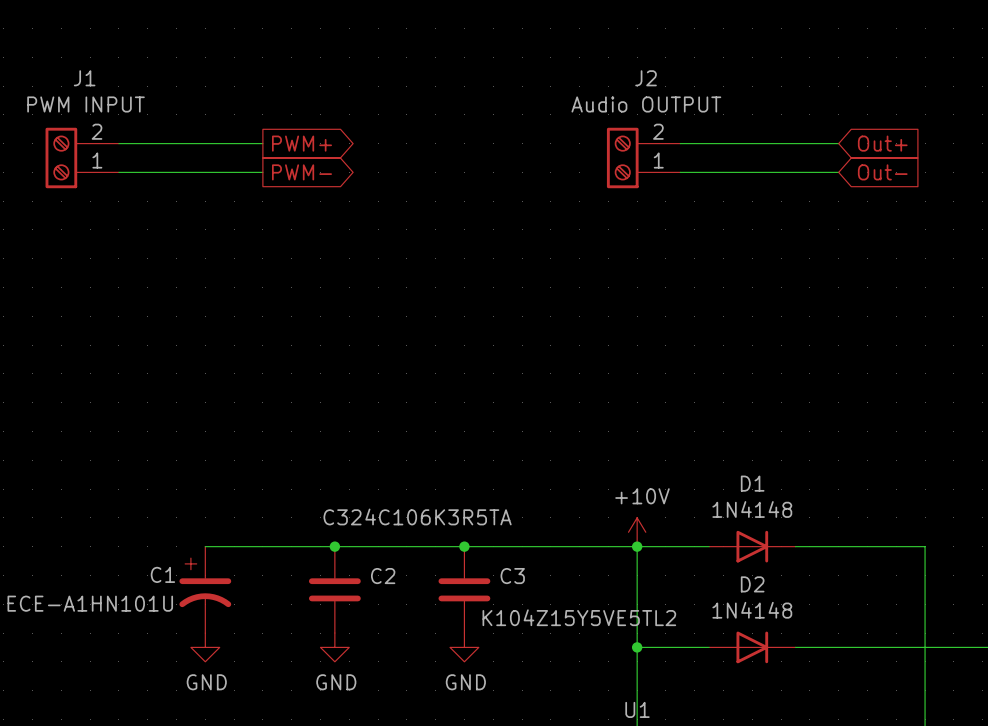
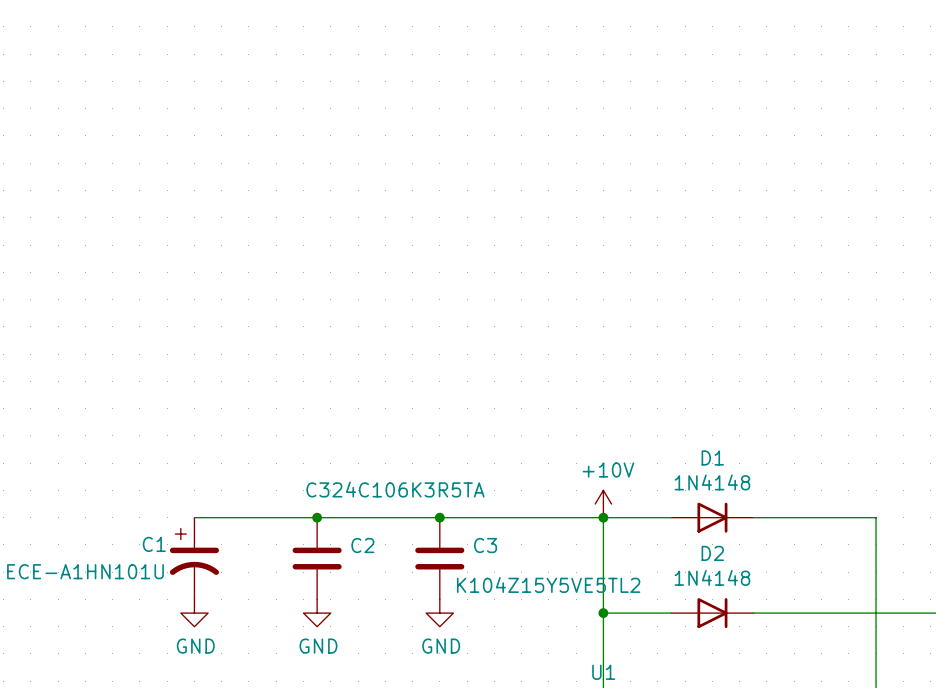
wire: (118, 143) (262, 143) -> none
global label: PWM+ (301, 143) -> none
wire: (680, 143) (838, 143) -> none
global label: Out+ (882, 143) -> none
J1: PWM INPUT (82, 157) -> none
J2: Audio OUTPUT (643, 157) -> none
wire: (118, 172) (262, 172) -> none
global label: PWM- (301, 172) -> none
wire: (680, 172) (838, 172) -> none
global label: Out- (882, 172) -> none

